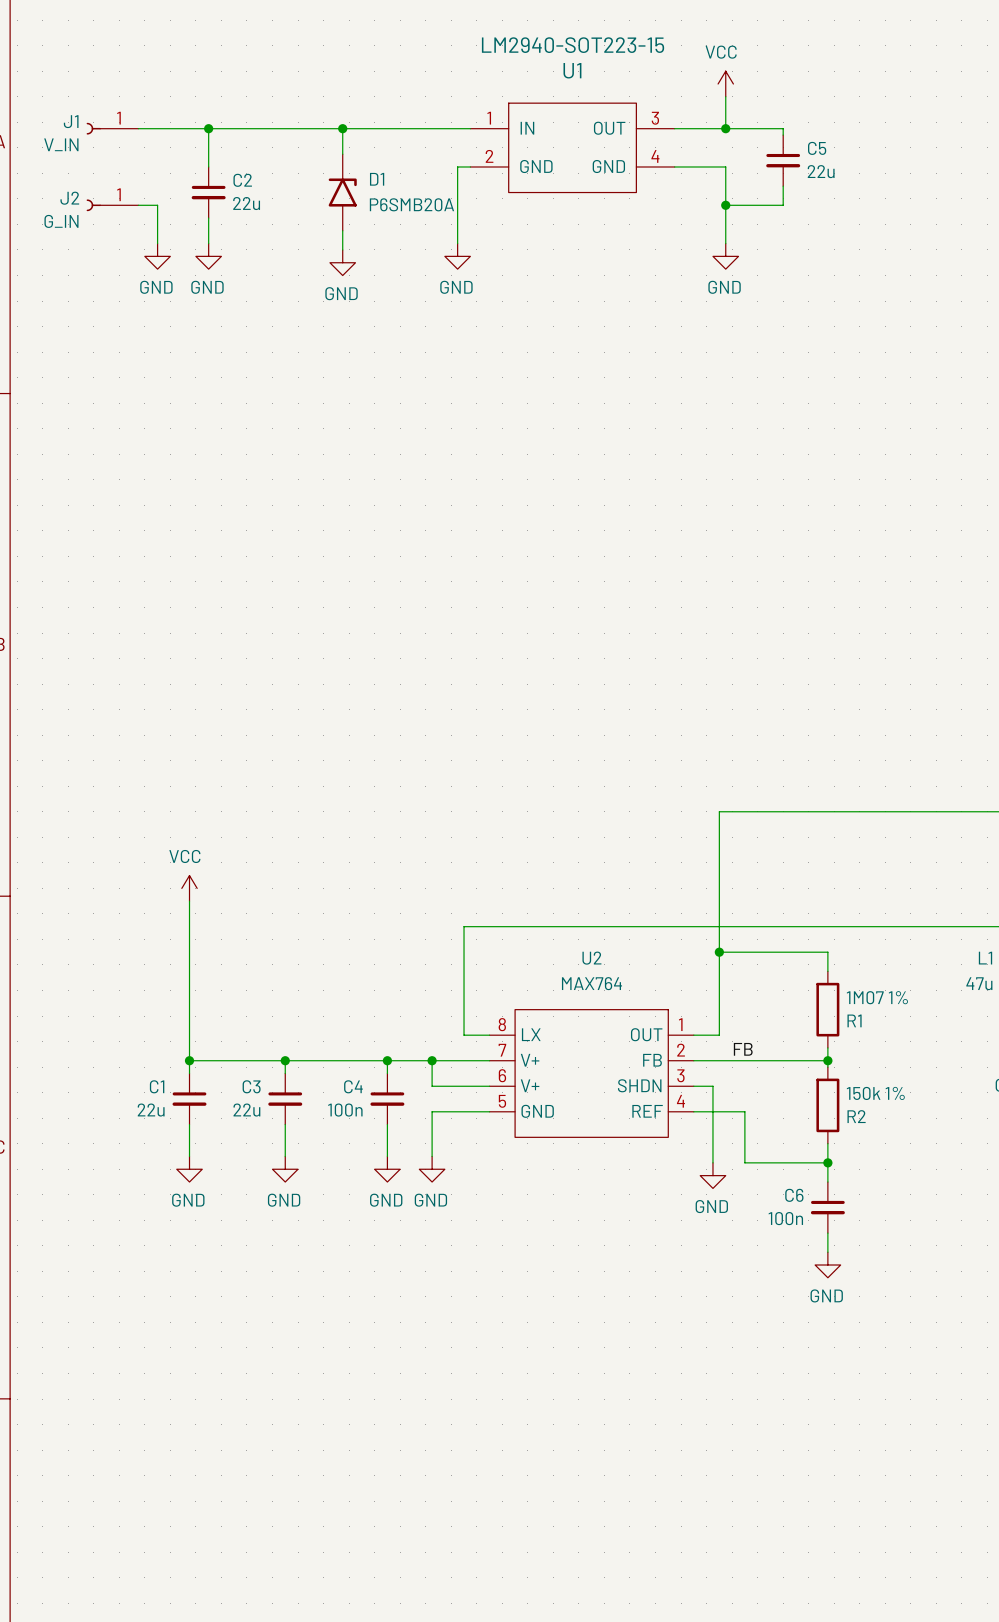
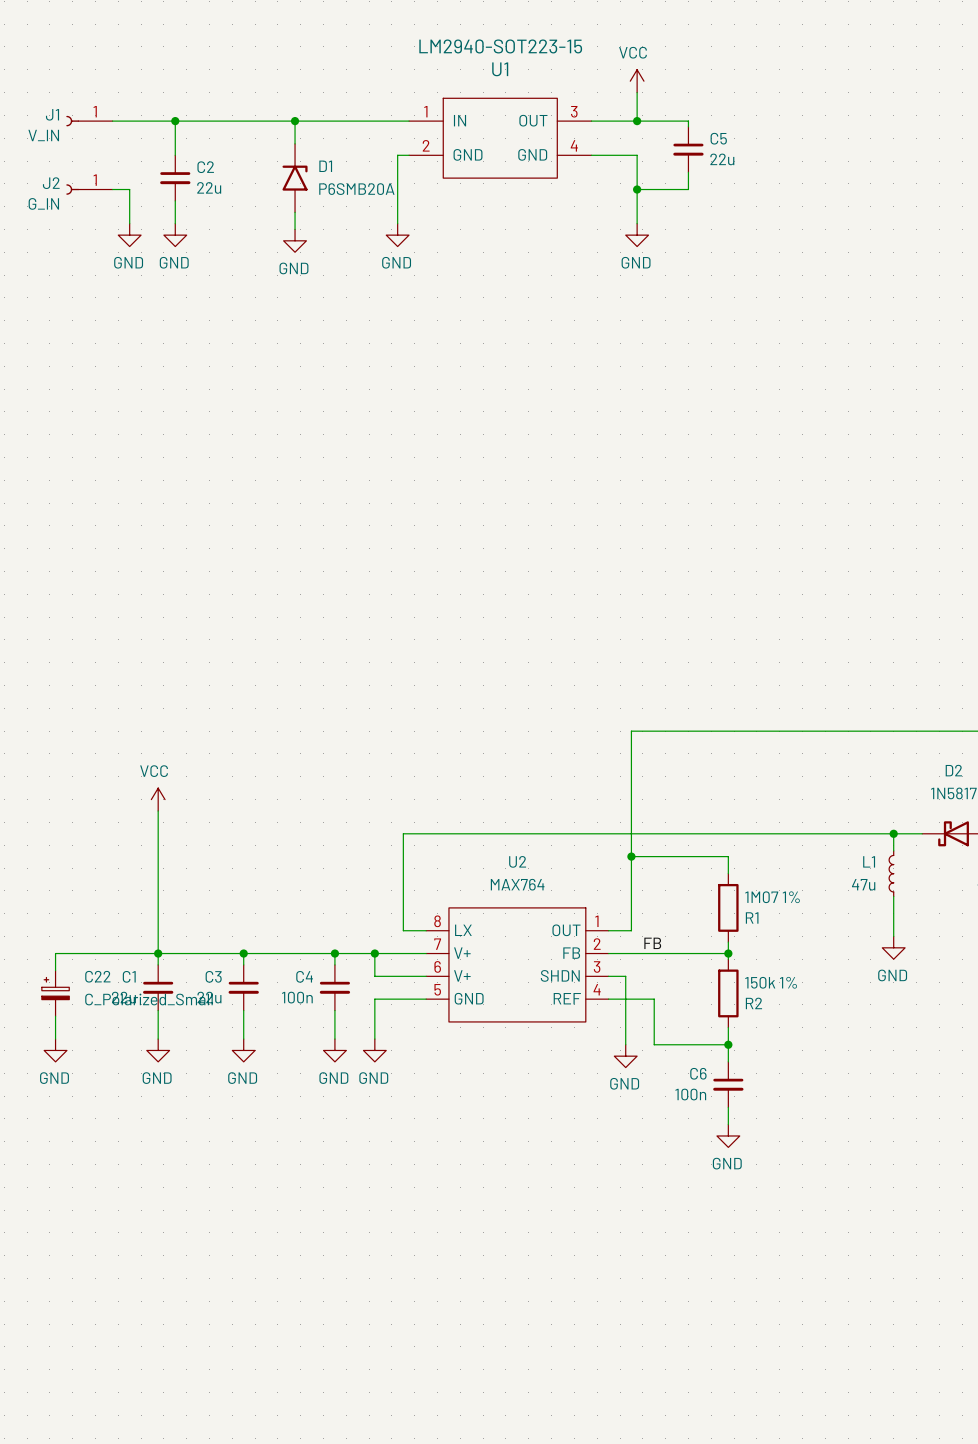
wire: none -> (158, 953) (55, 953) (55, 970)
C22: none -> C_Polarized_Small (55, 993)
wire: none -> (55, 1016) (55, 1039)
power symbol: none -> GND (55, 1050)

